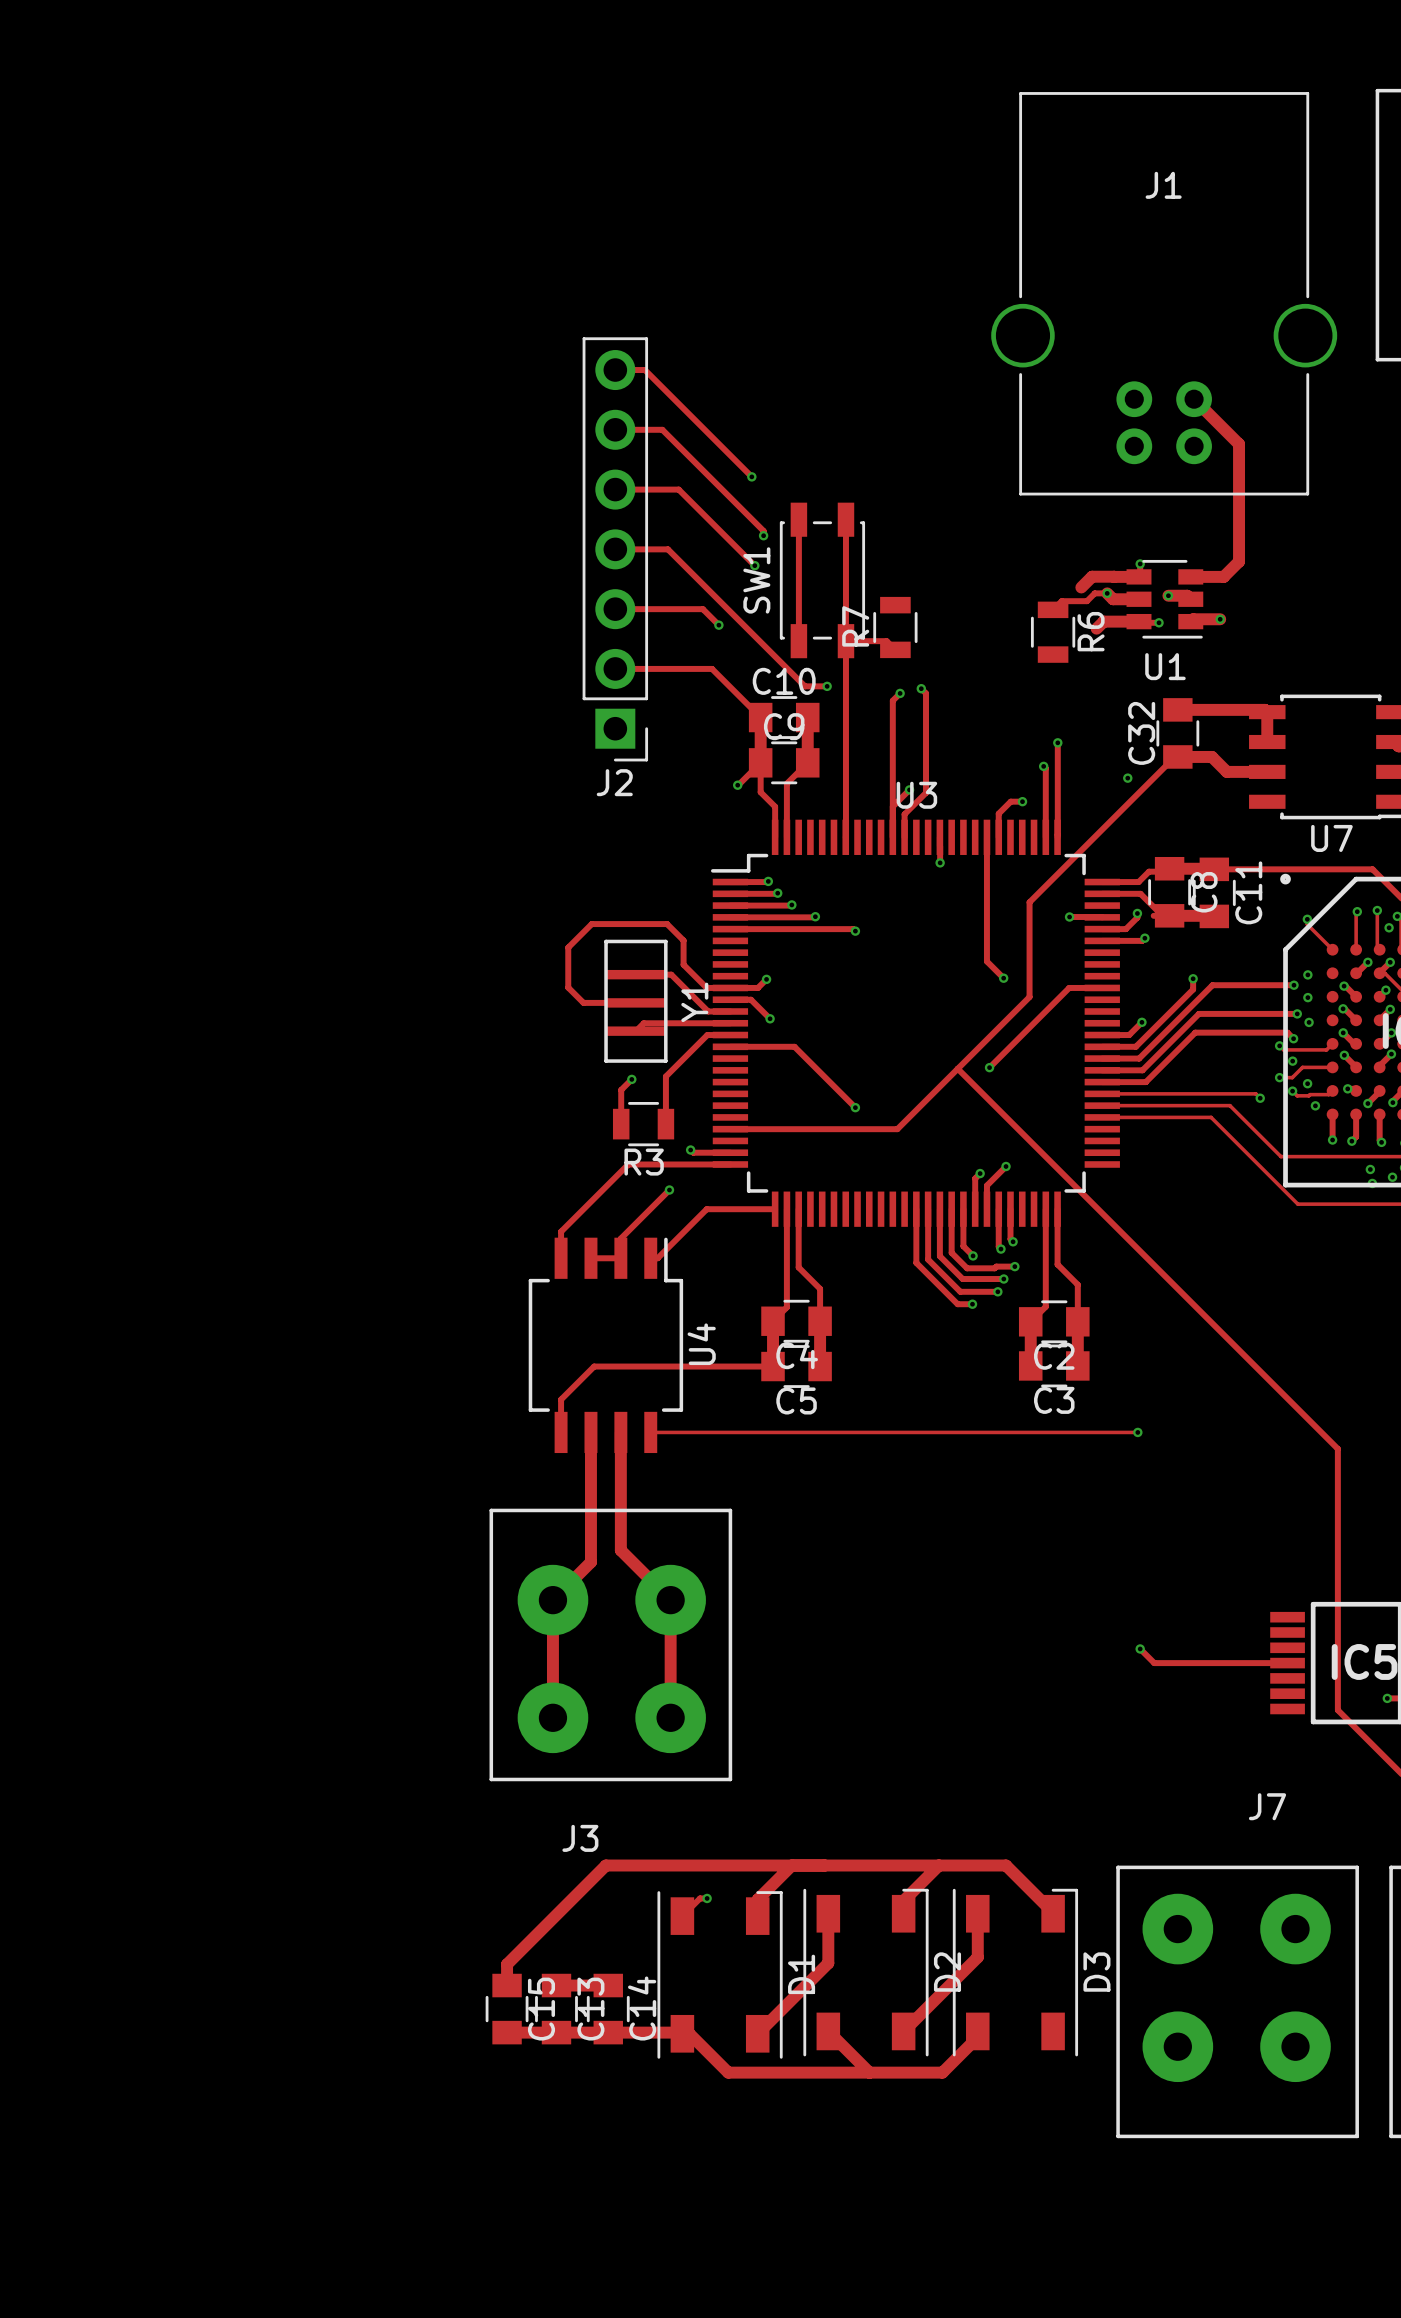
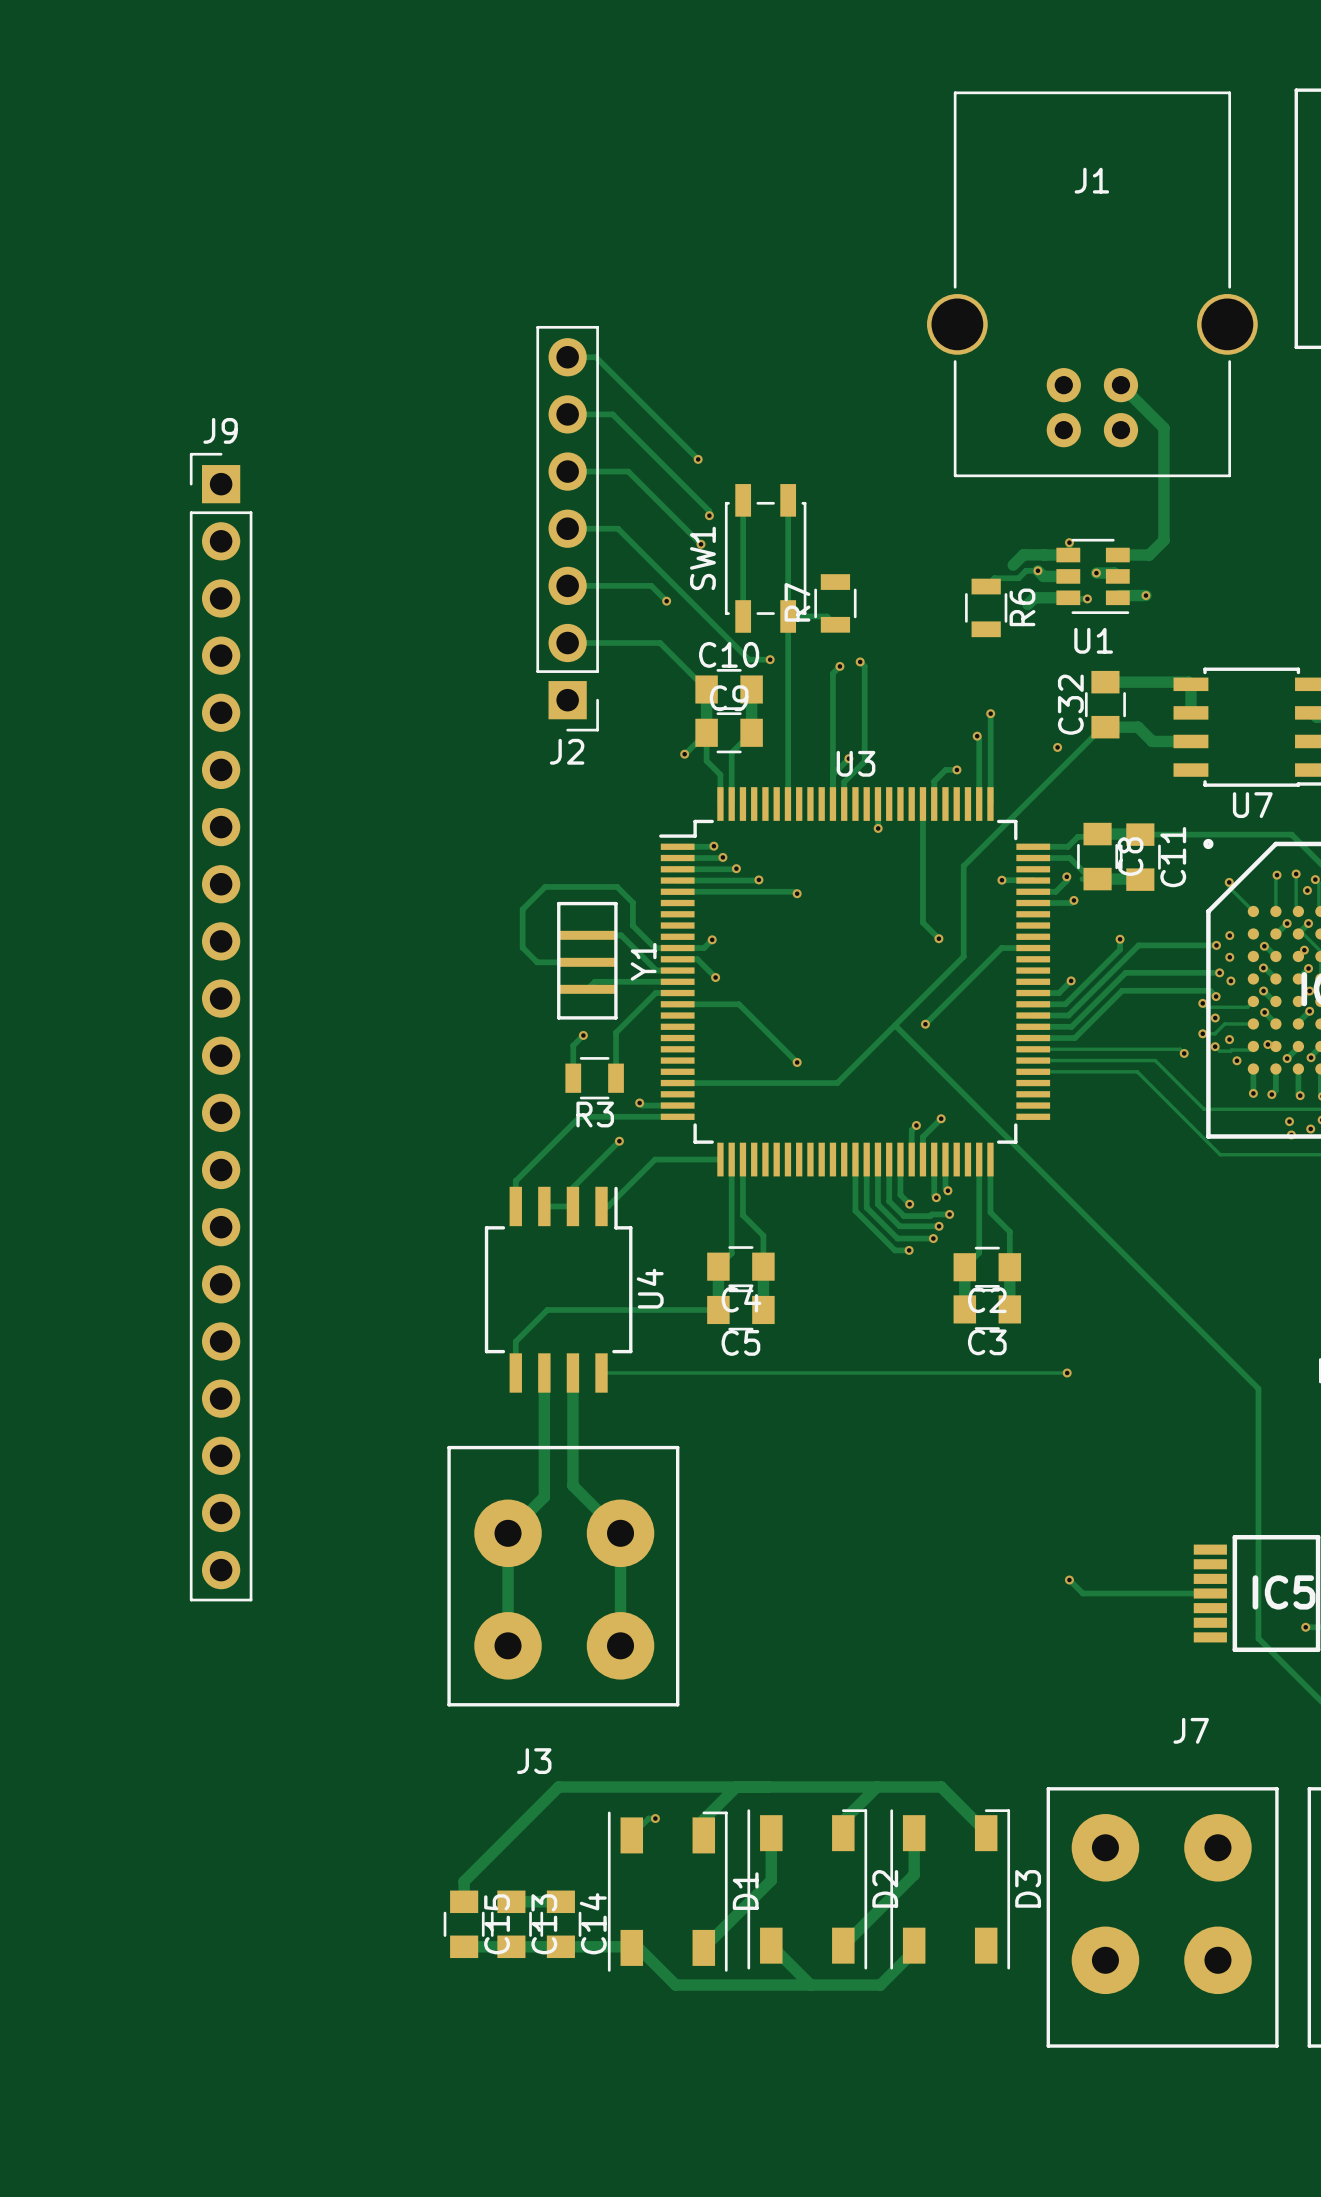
J9: none -> (221, 1027)

